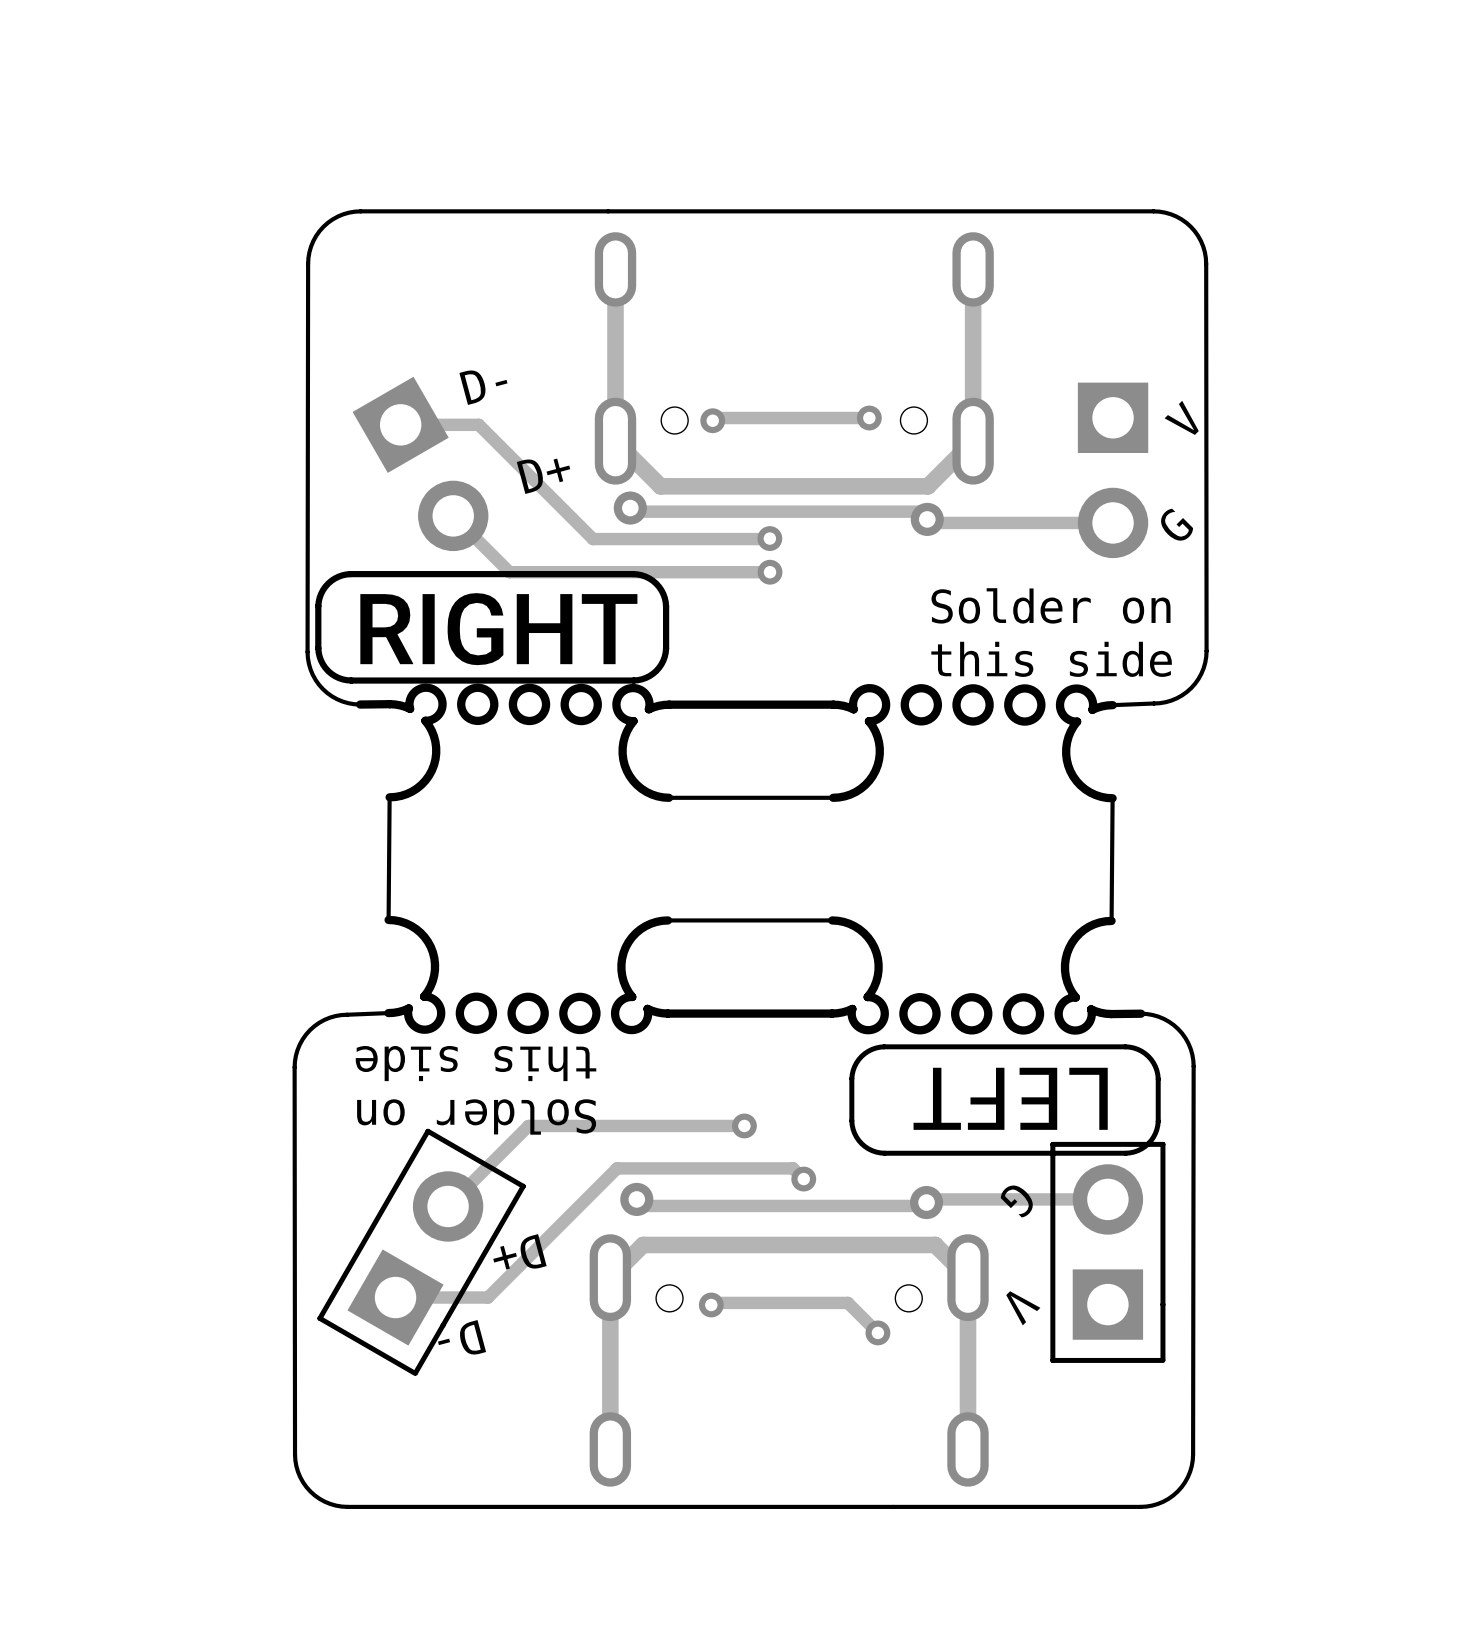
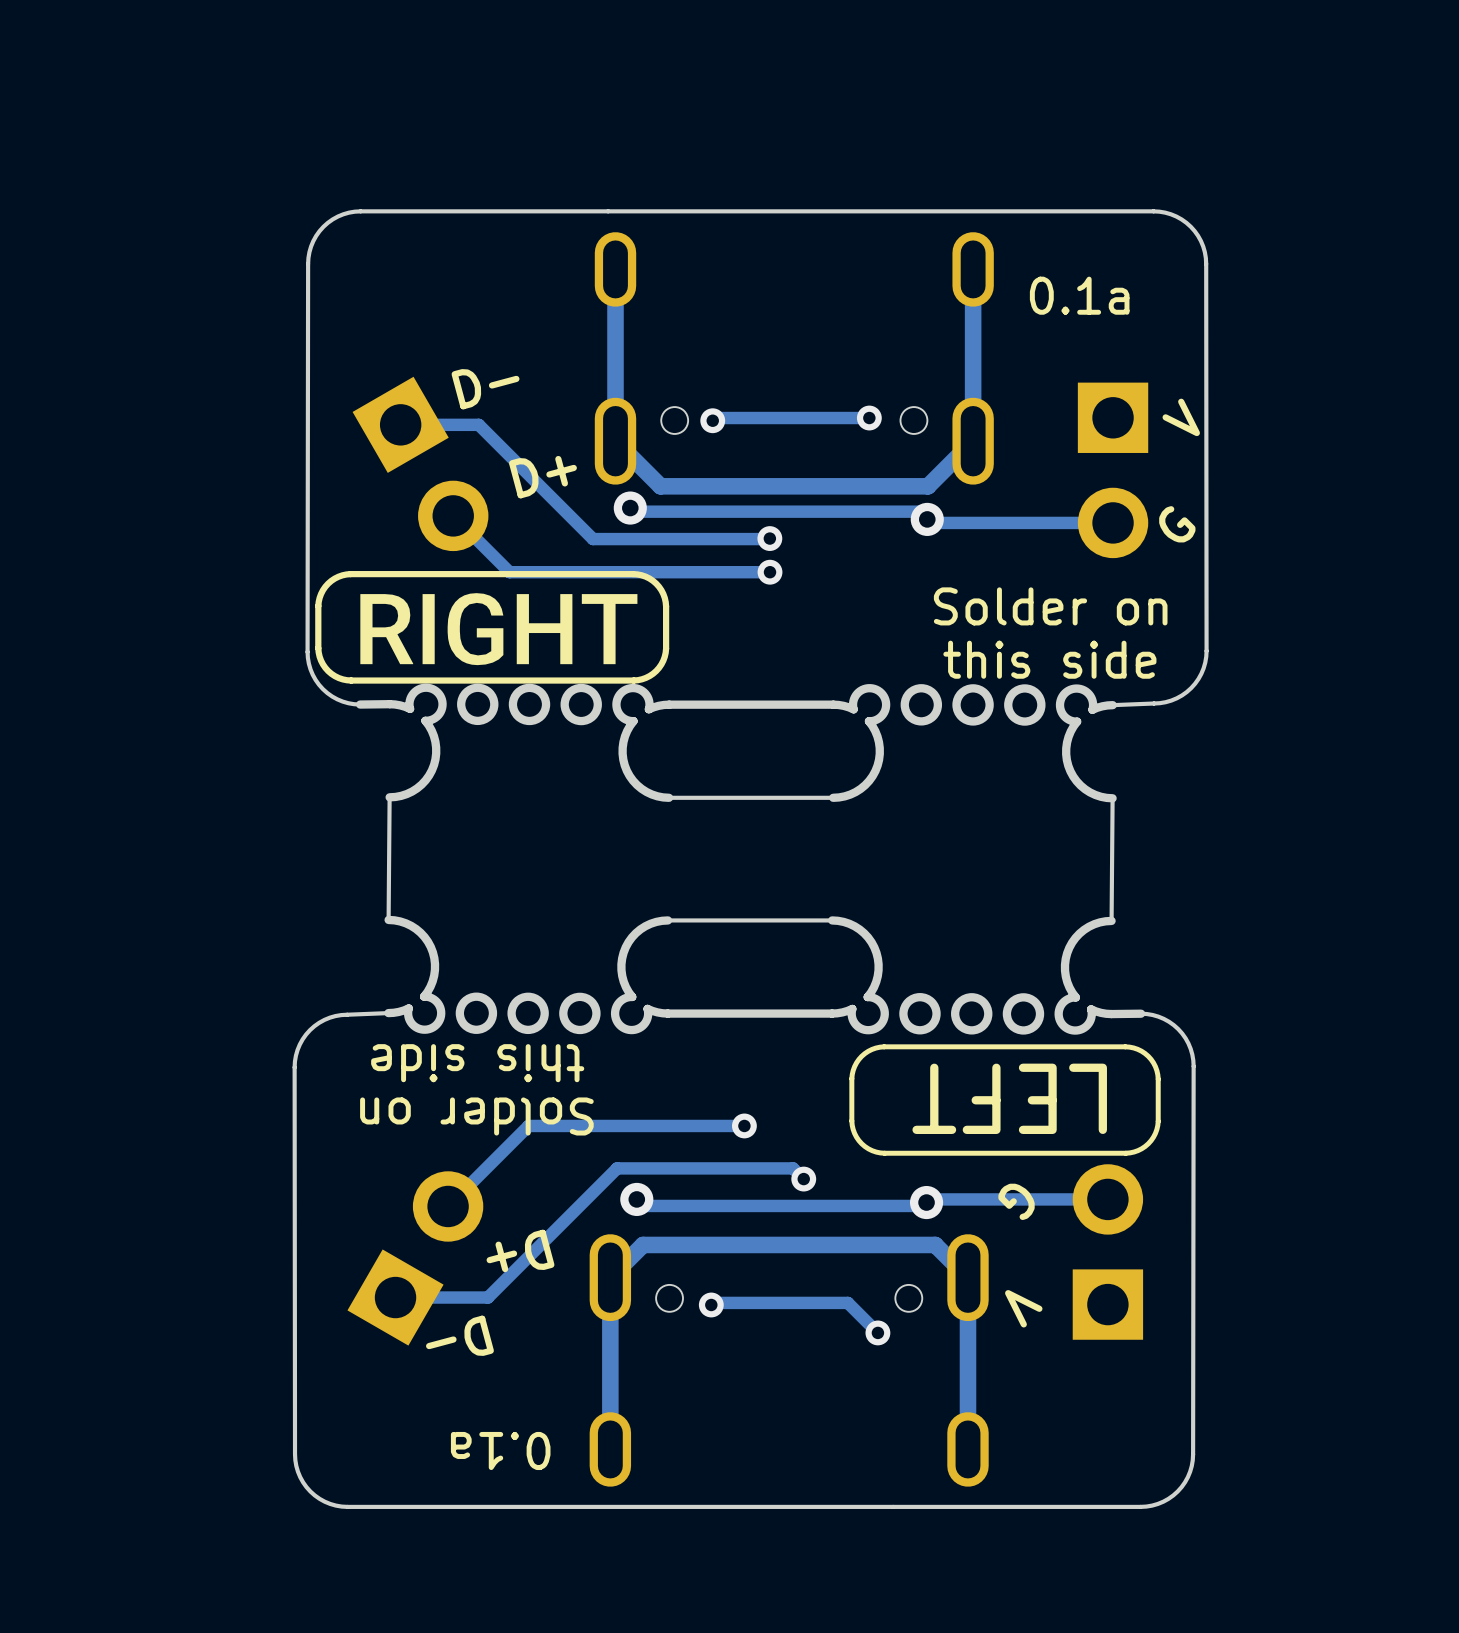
text: none -> 0.1a (1079, 295)
part footprint: [317, 1128, 526, 1376] -> [347, 1171, 484, 1346]
part footprint: [1050, 1141, 1166, 1363] -> [1072, 1164, 1144, 1340]
text: none -> 0.1a (500, 1450)

